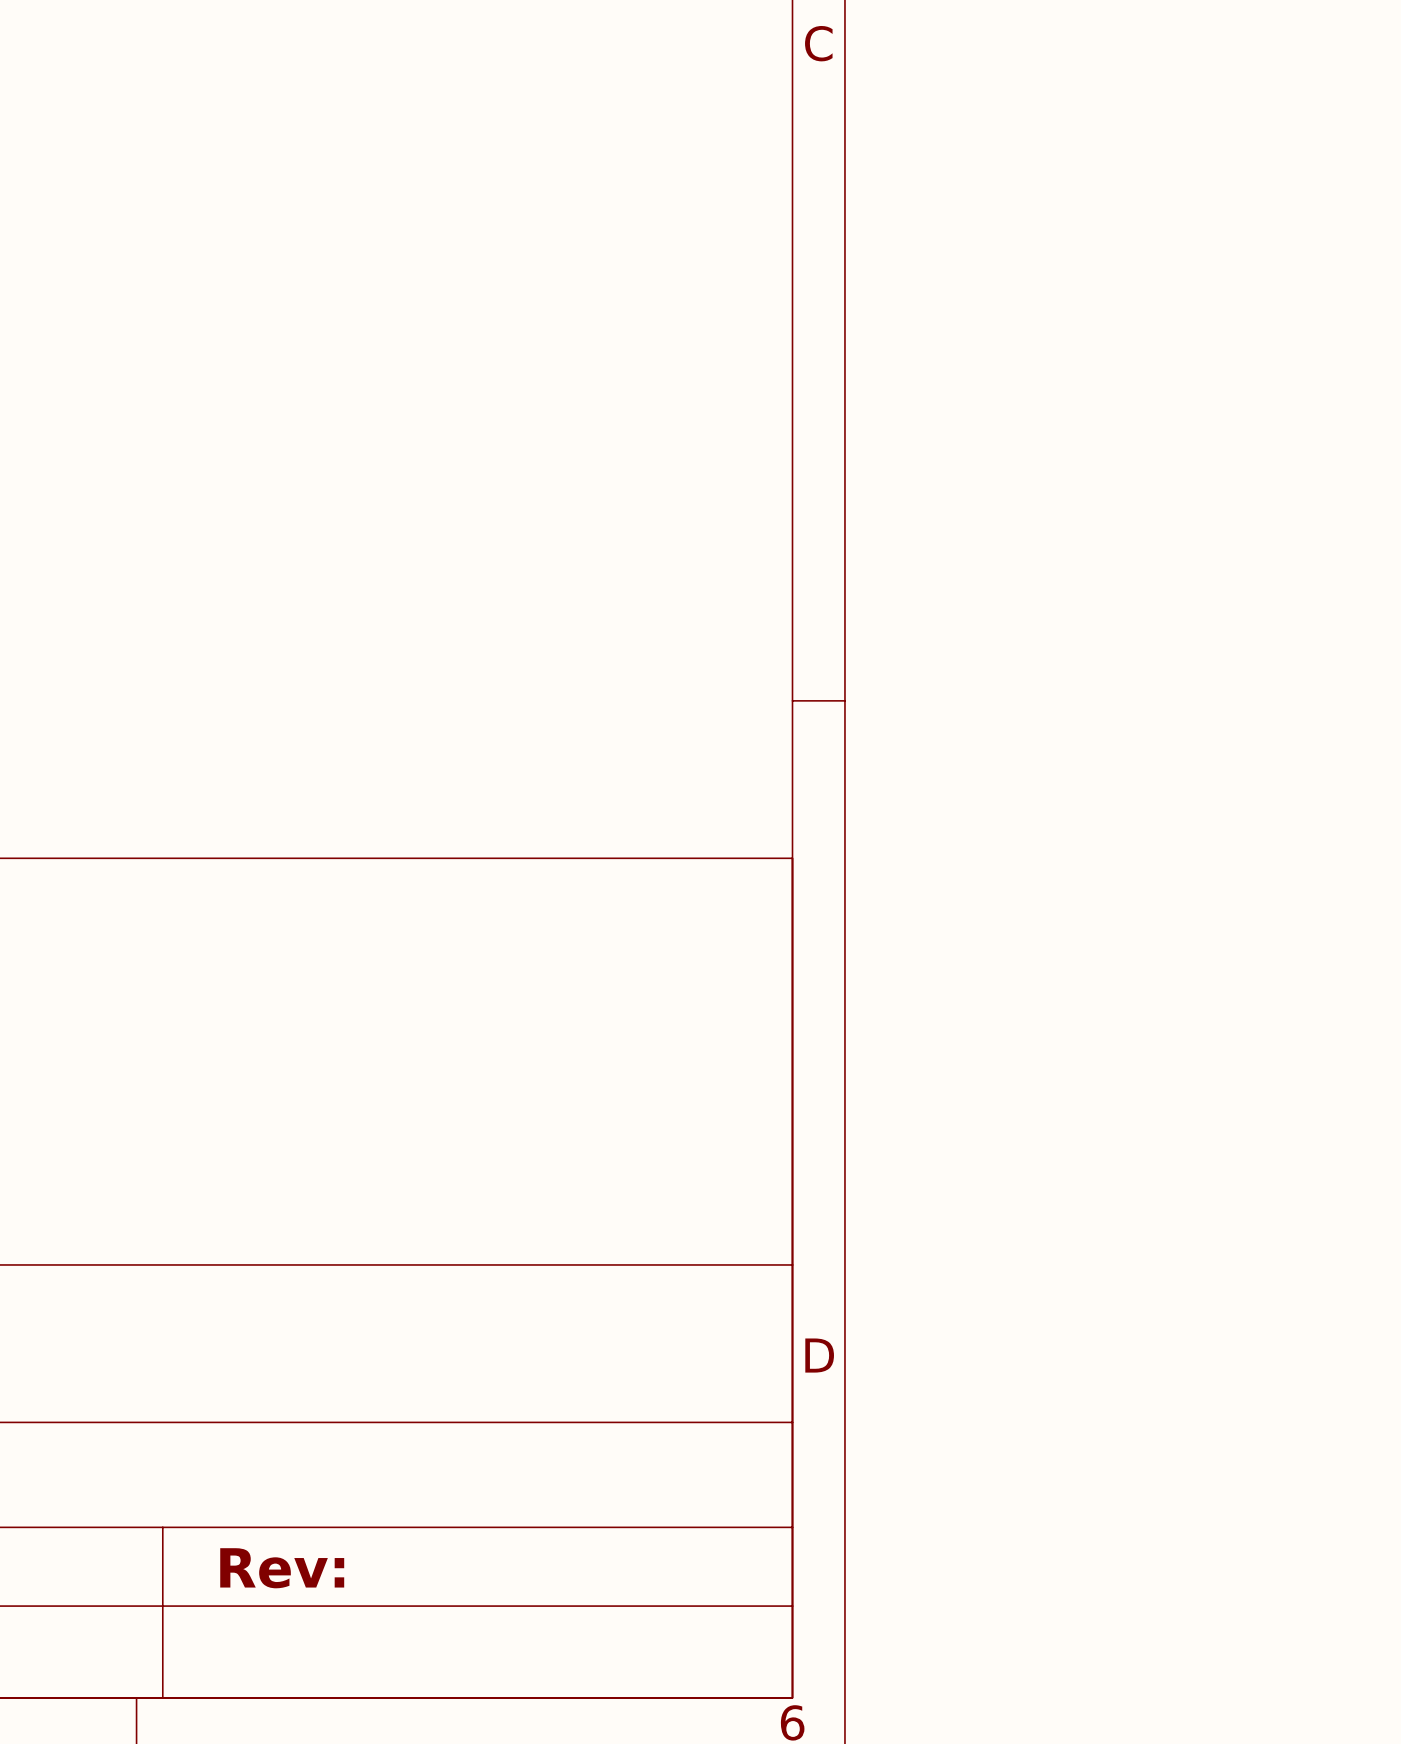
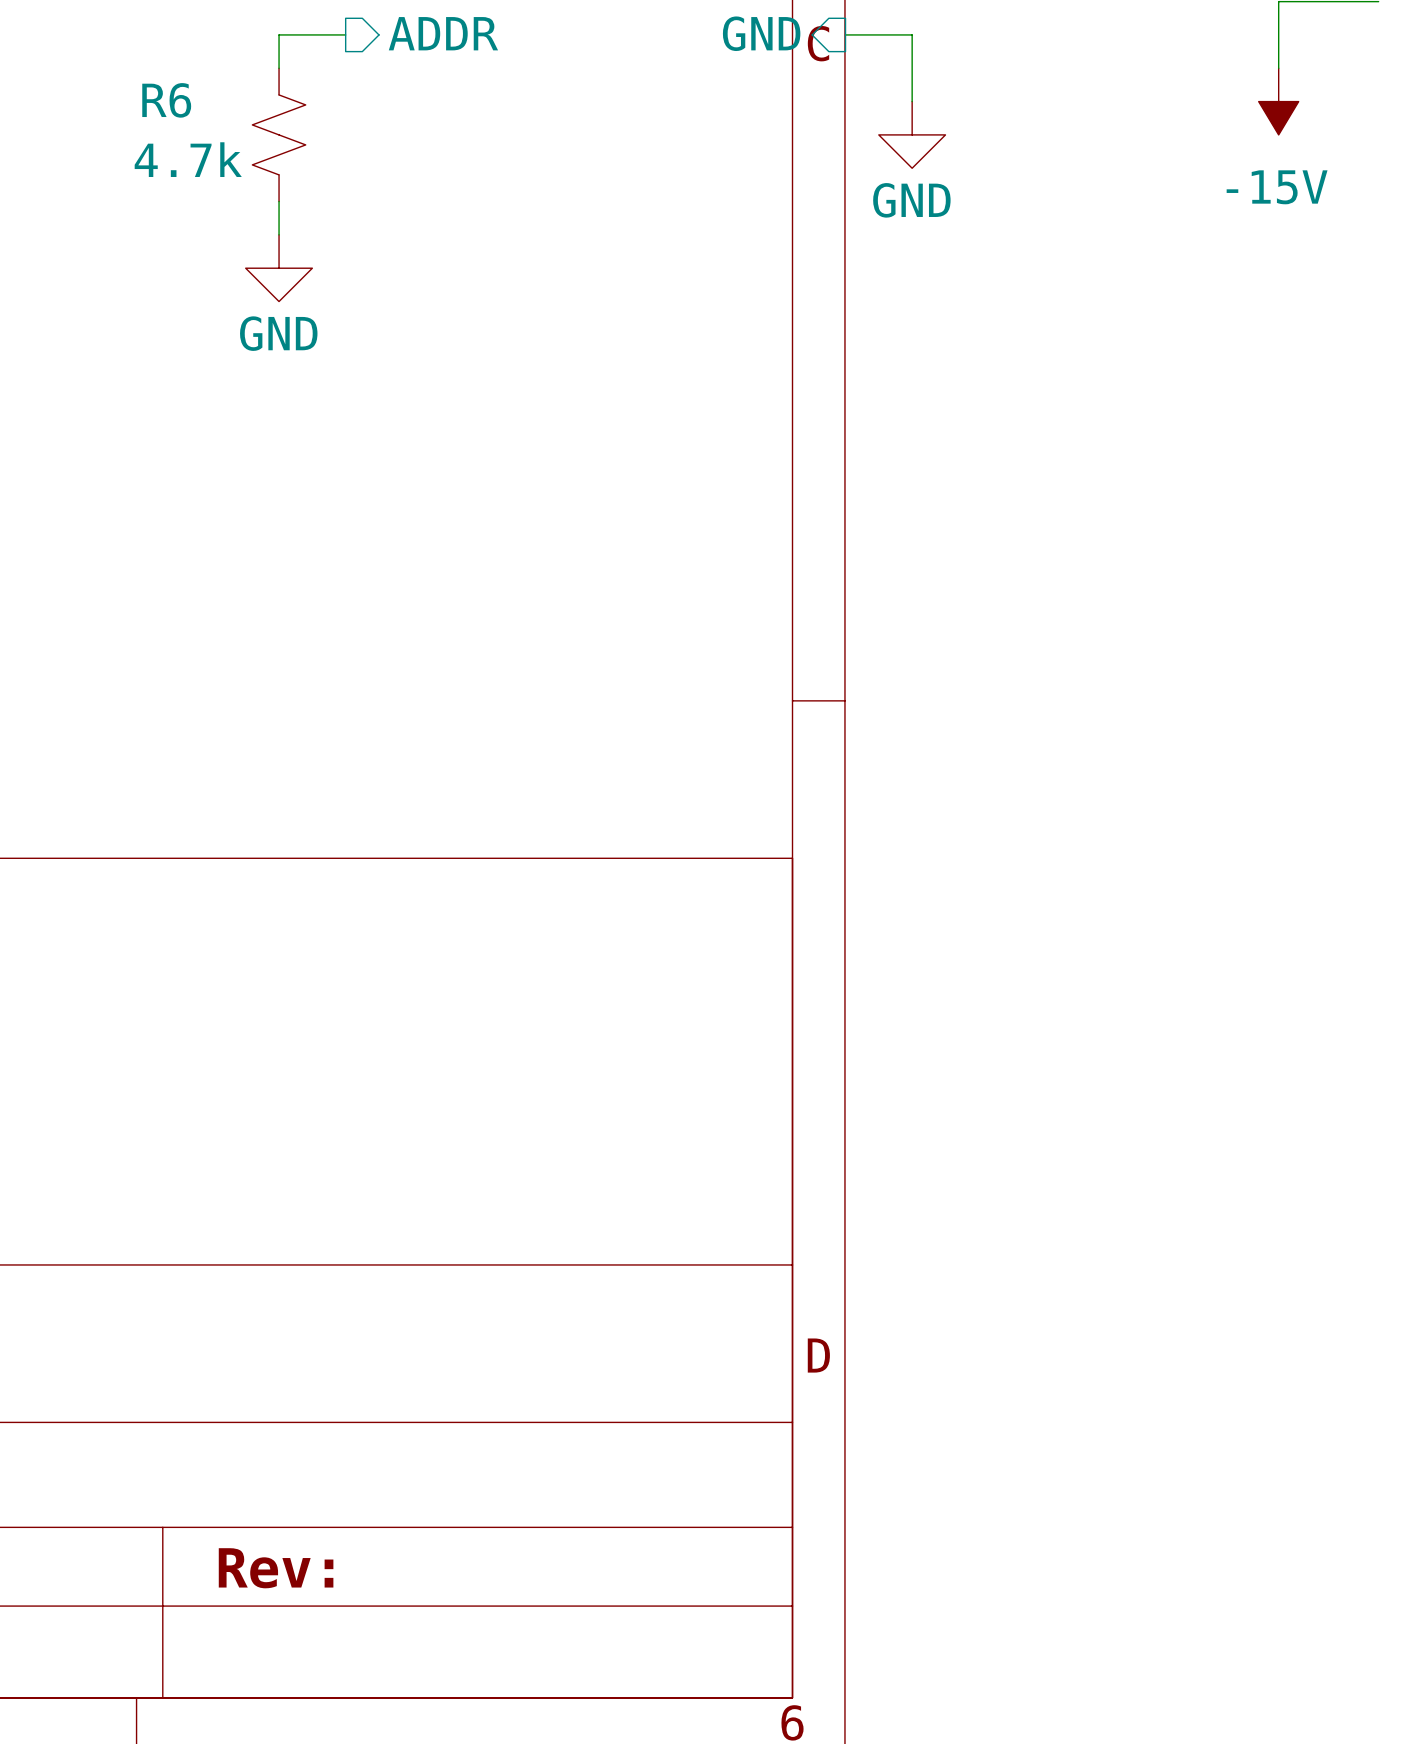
wire: none -> (1378, 1) (1278, 1) (1278, 68)
sheet pin: none -> ADDR (443, 33)
sheet pin: none -> GND (761, 33)
wire: none -> (345, 34) (279, 34) (279, 68)
wire: none -> (845, 34) (912, 34) (912, 101)
power symbol: none -> -15V (1278, 101)
R6: none -> 4.7k (279, 134)
power symbol: none -> GND (912, 134)
wire: none -> (279, 201) (279, 234)
power symbol: none -> GND (279, 268)

